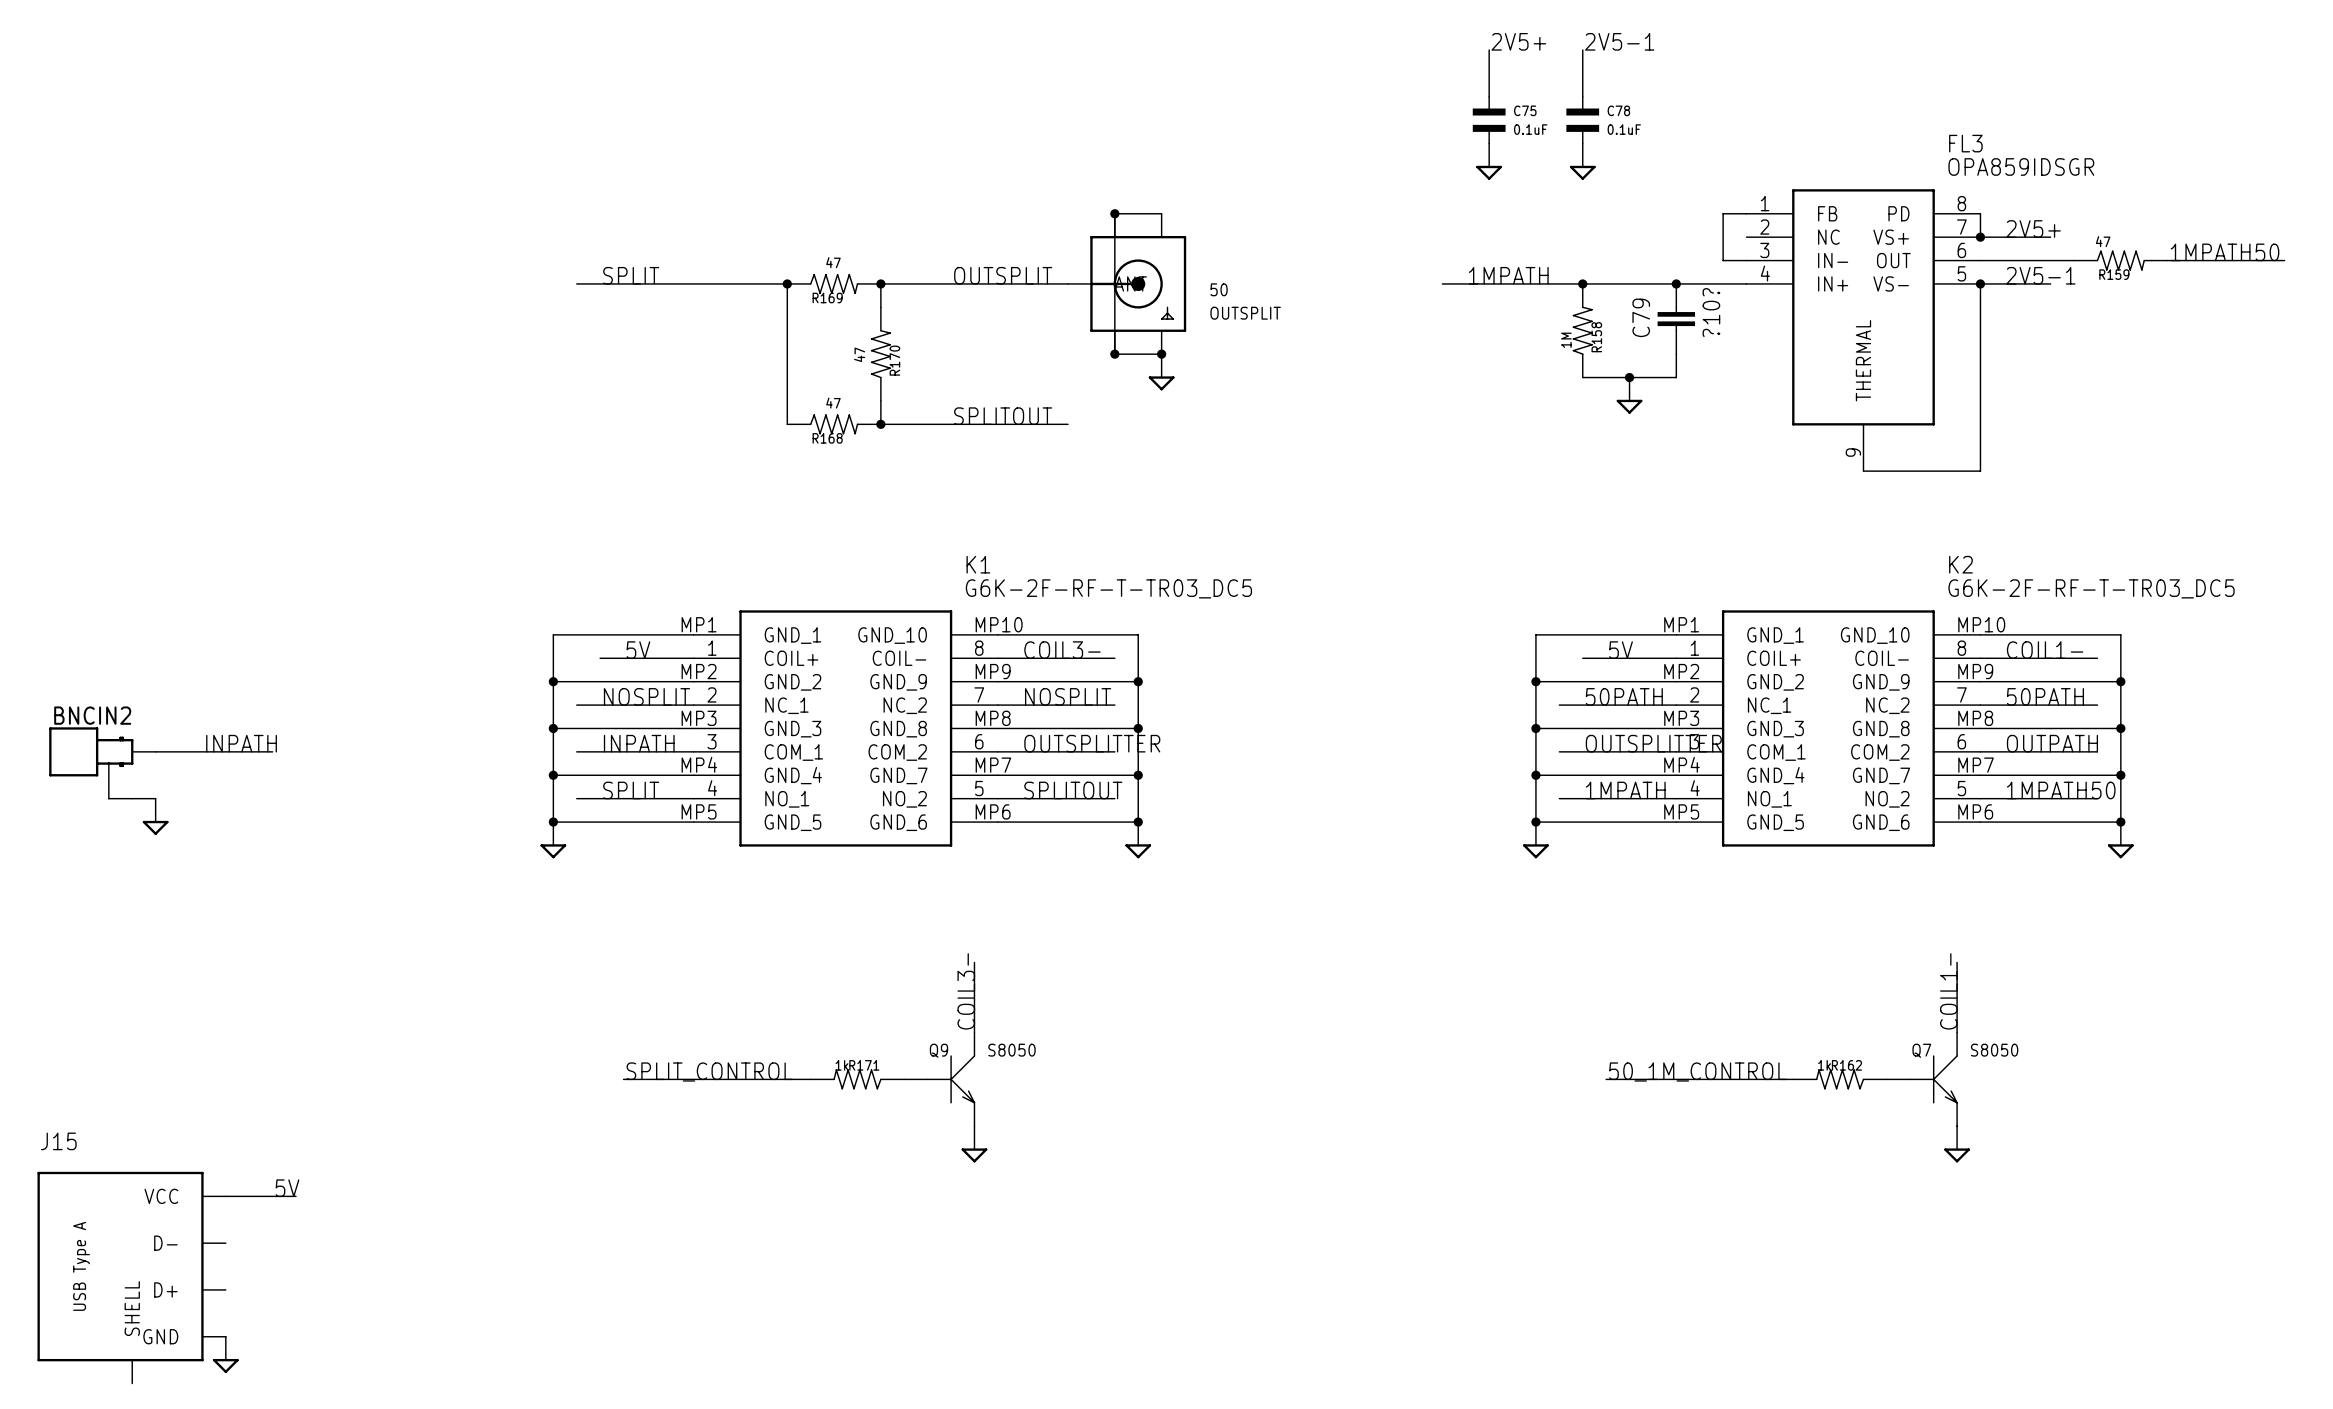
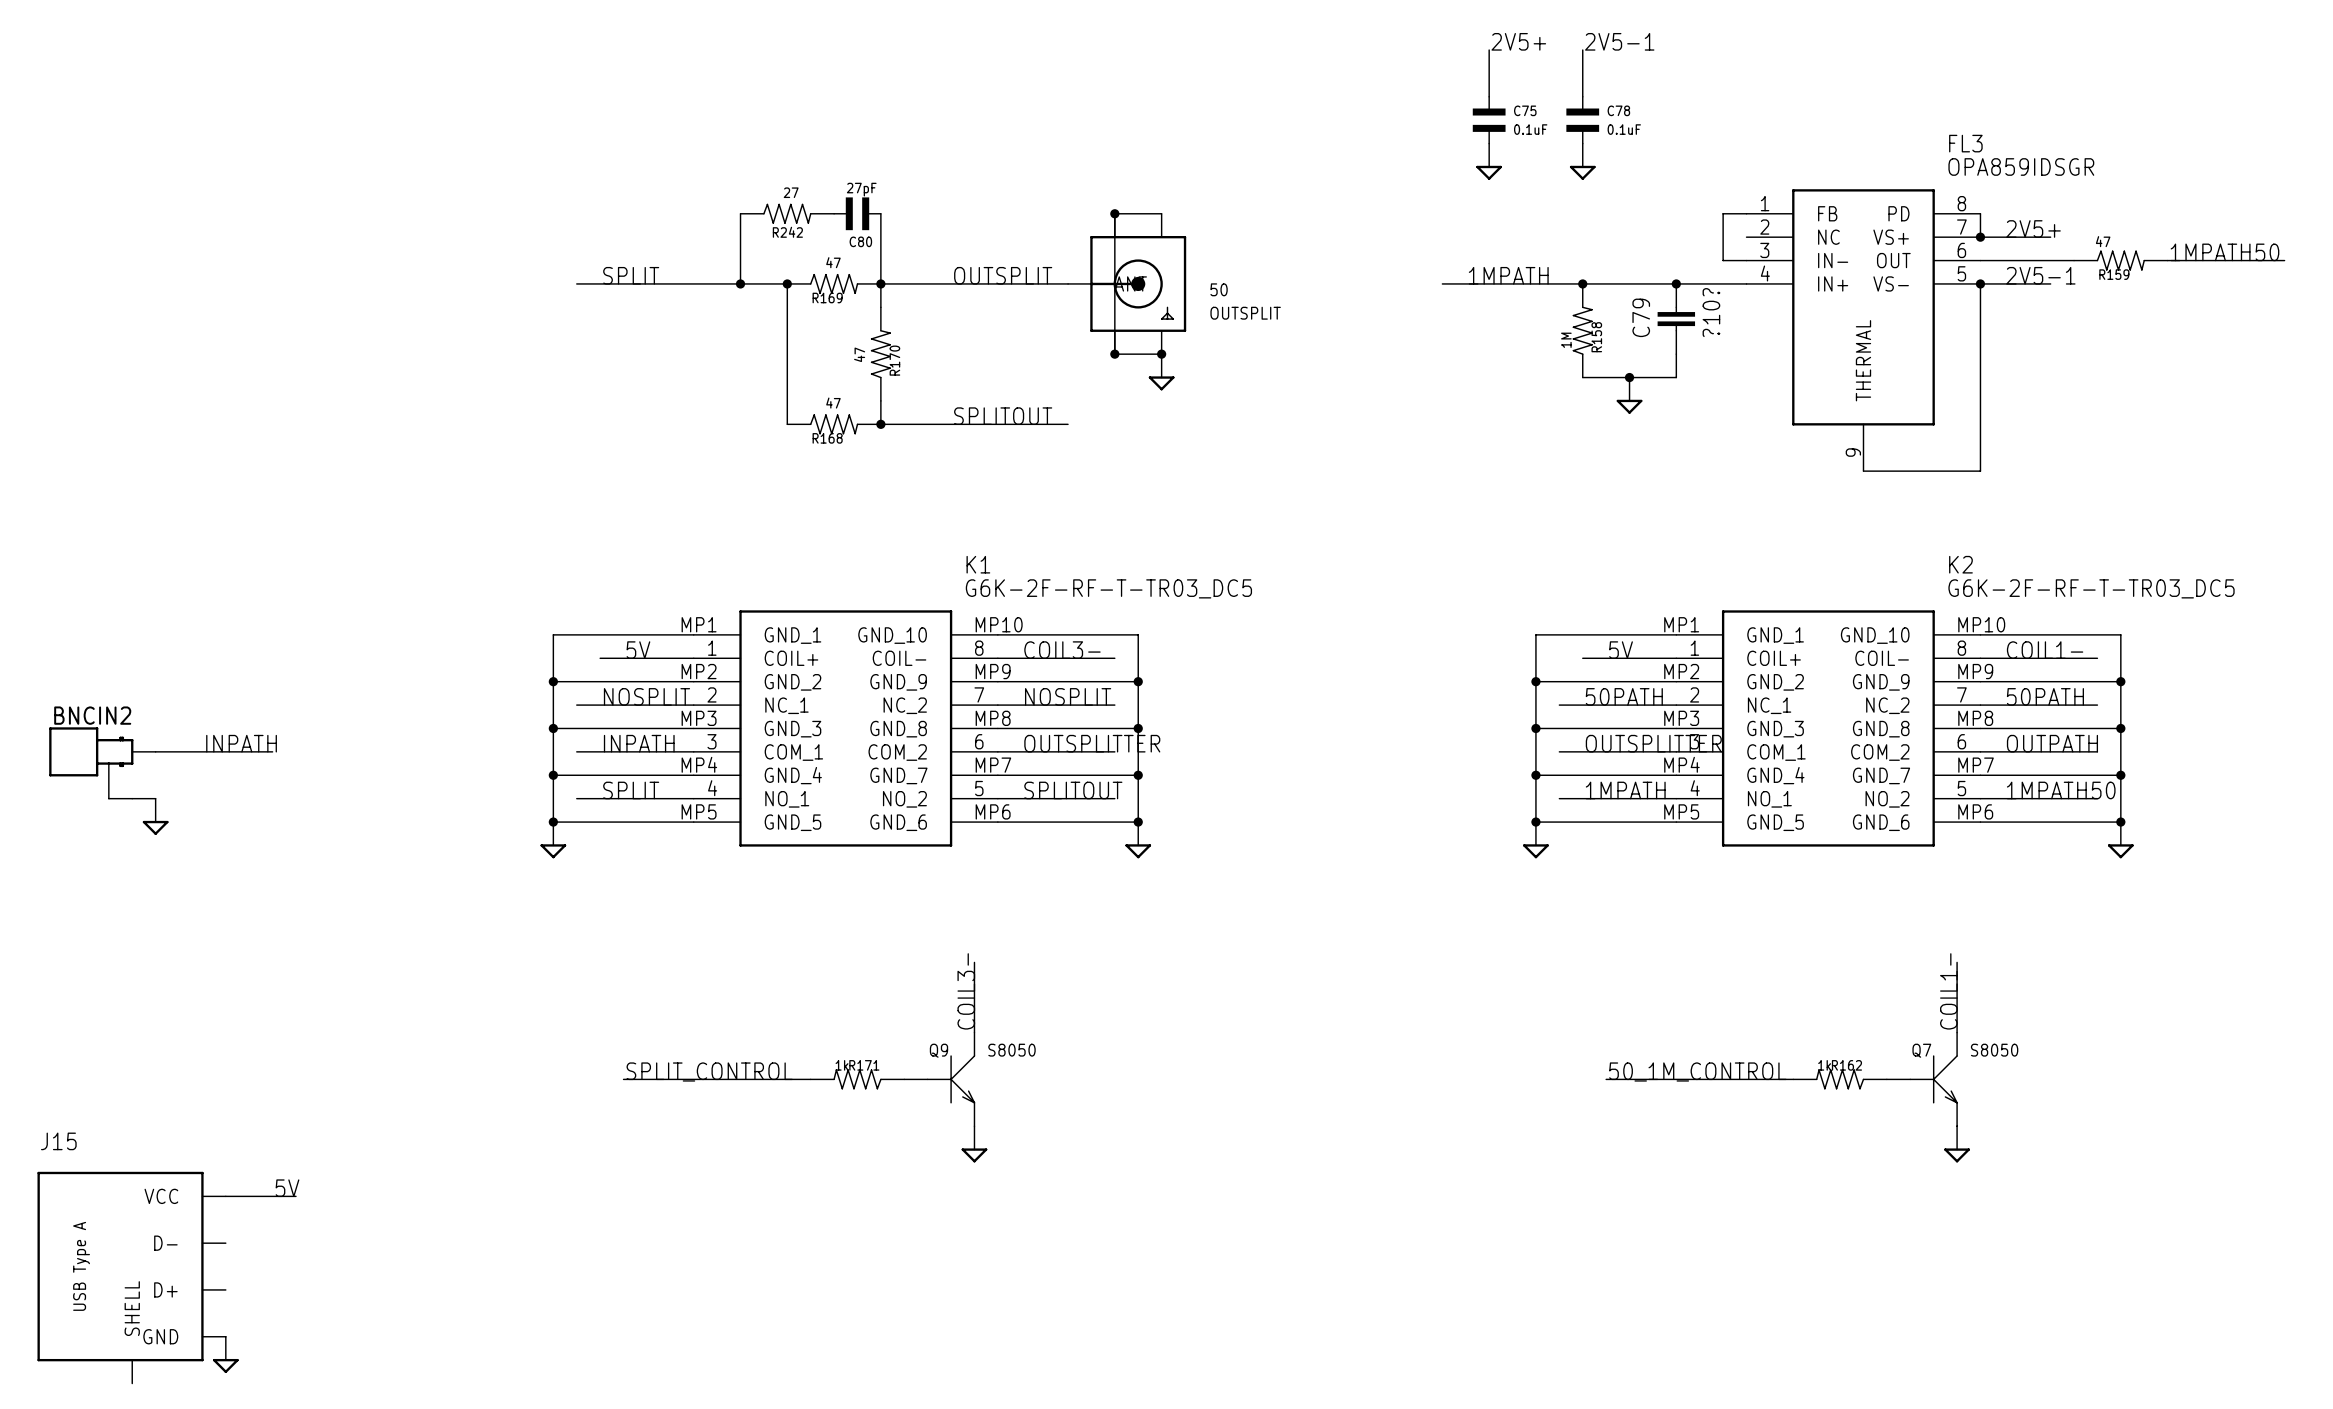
wire: none -> (740, 213) (740, 283)
R242: none -> 27 (787, 213)
C80: none -> 27pF (857, 213)
wire: none -> (880, 213) (880, 283)
junction: none -> (740, 283)

